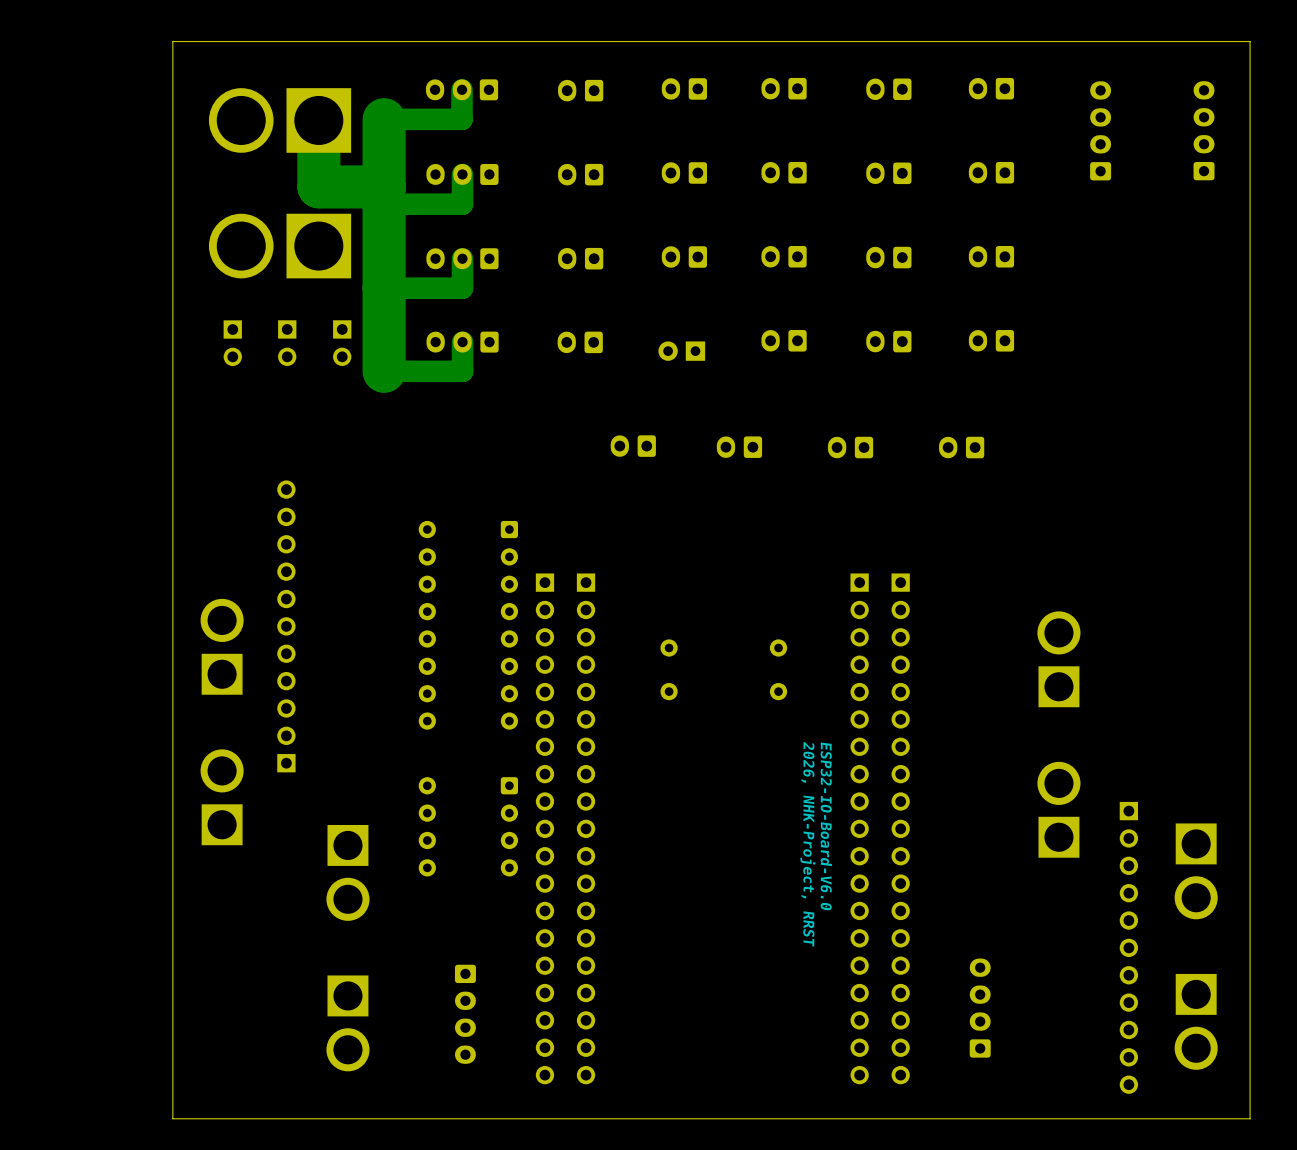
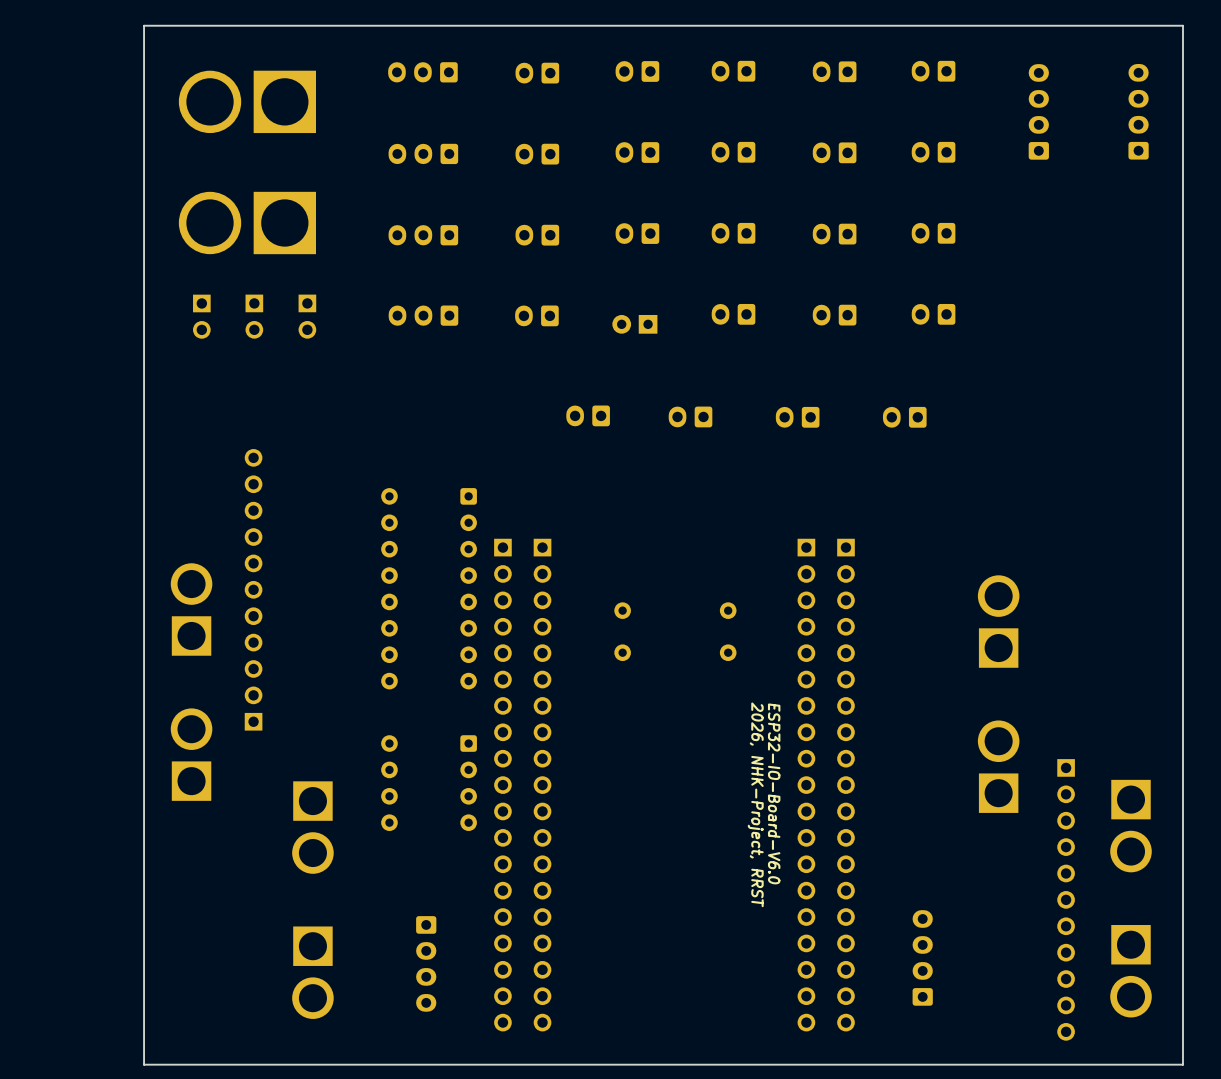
track: (462, 89) (462, 119) (384, 119) (384, 371) (462, 371) (462, 342) -> none
track: (318, 120) (318, 186) (384, 186) -> none
track: (462, 174) (462, 204) (384, 204) -> none
track: (462, 258) (462, 288) (384, 288) -> none

